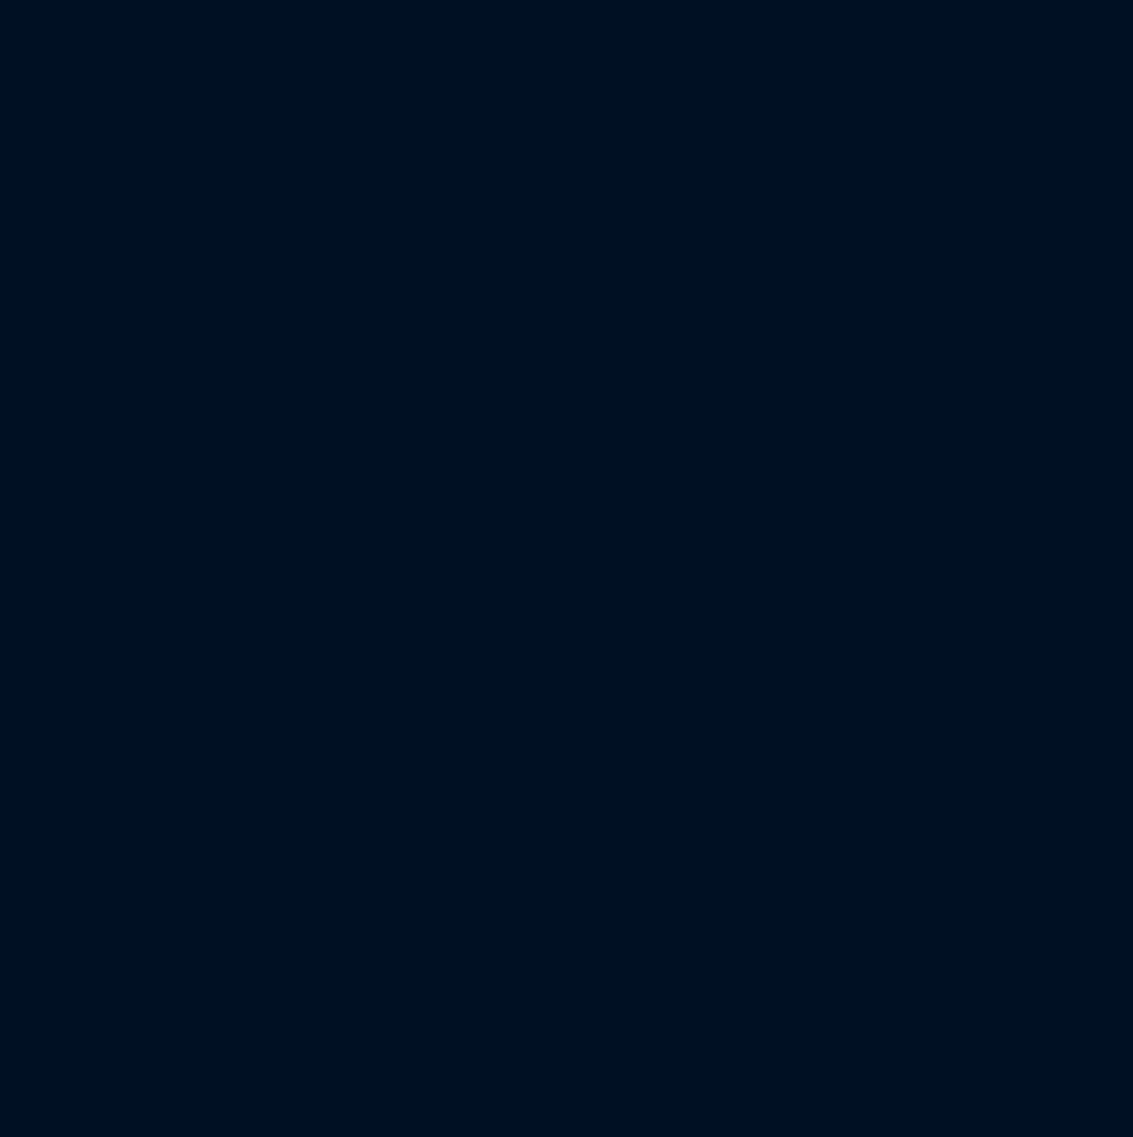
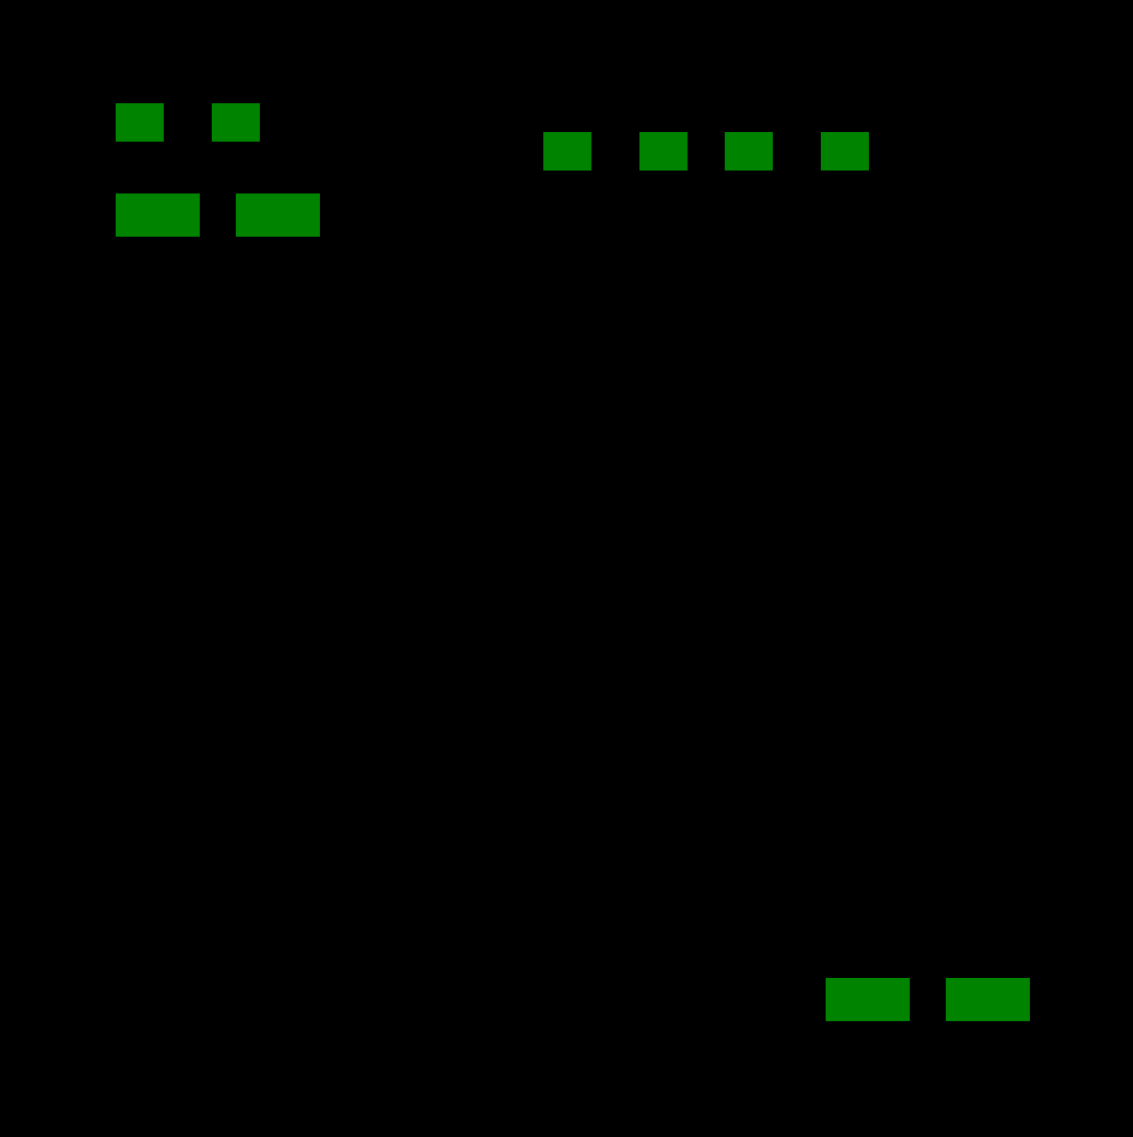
part: none -> (187, 122)
part: none -> (615, 151)
part: none -> (796, 151)
part: none -> (217, 215)
part: none -> (927, 999)

